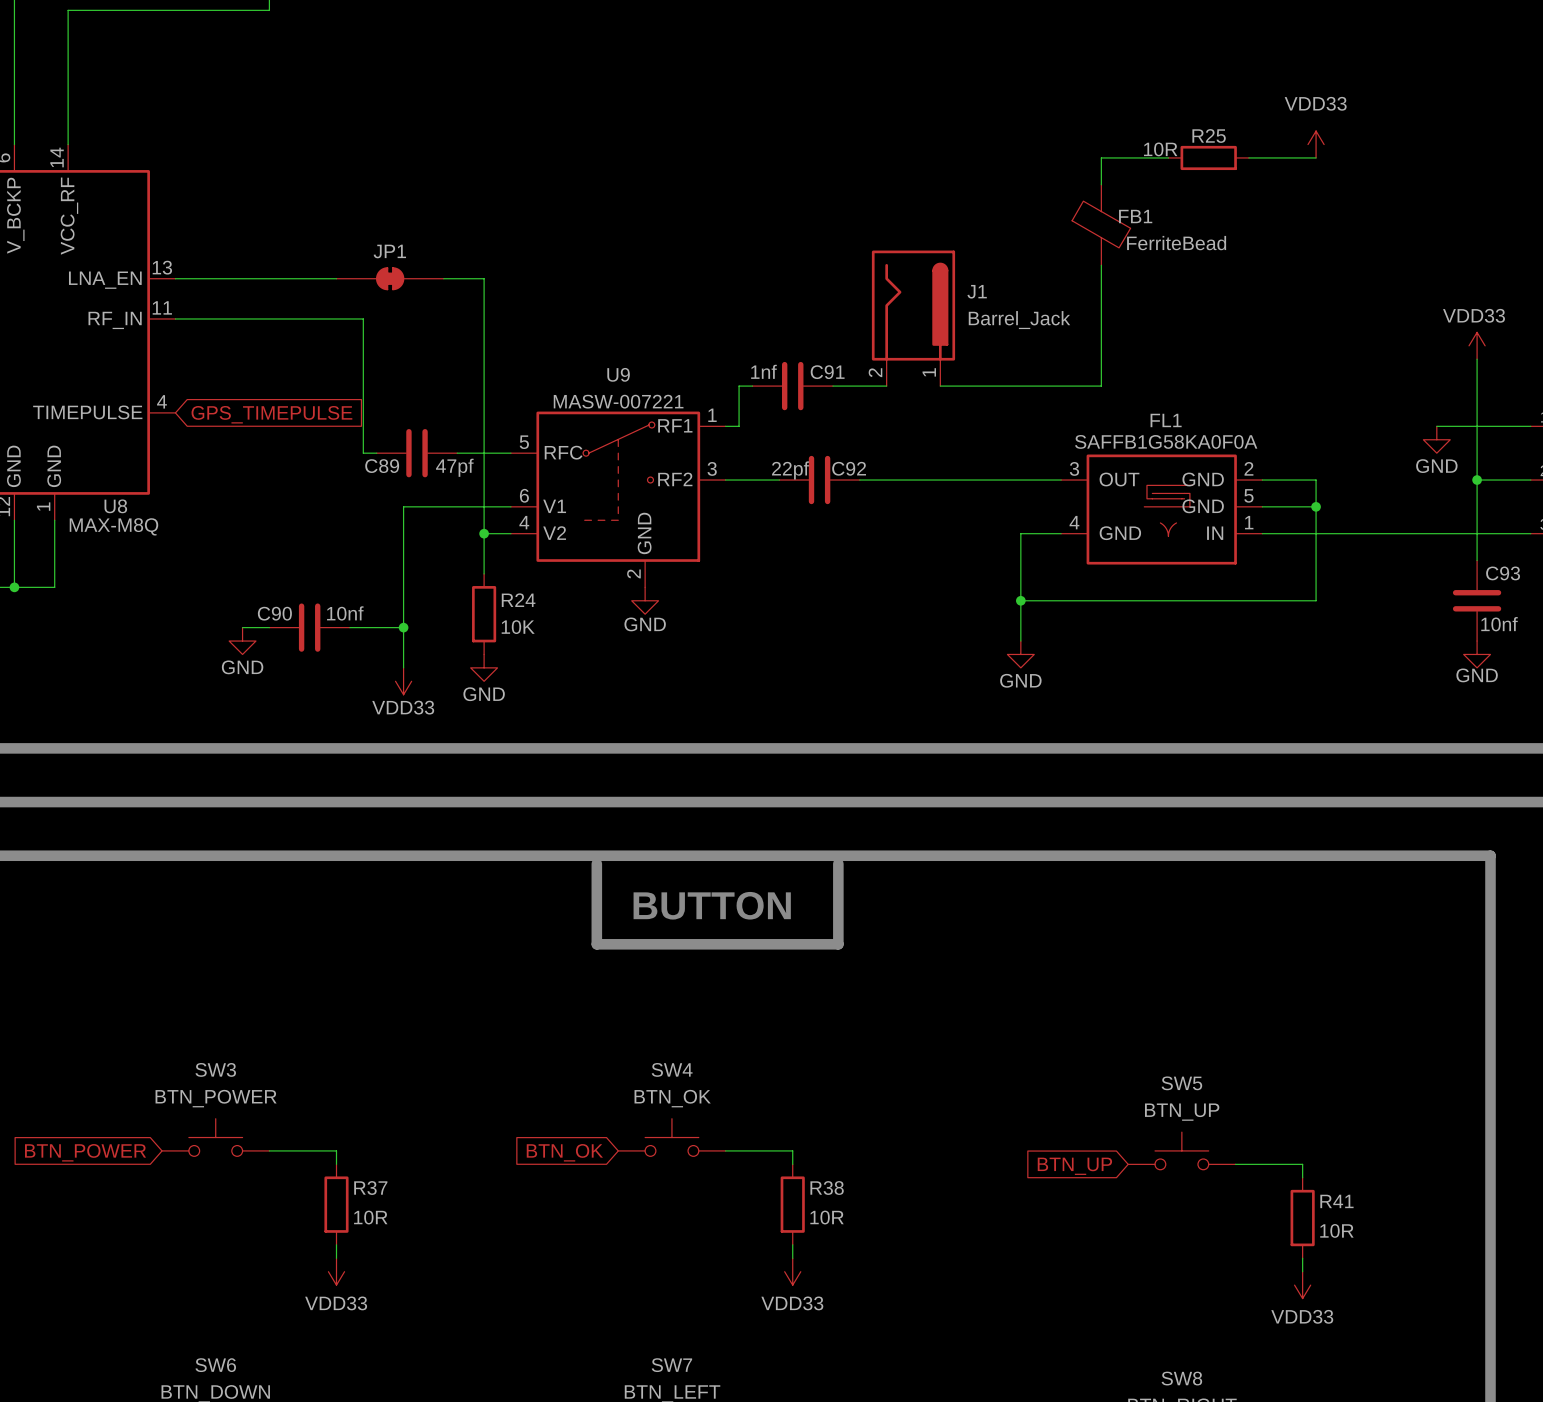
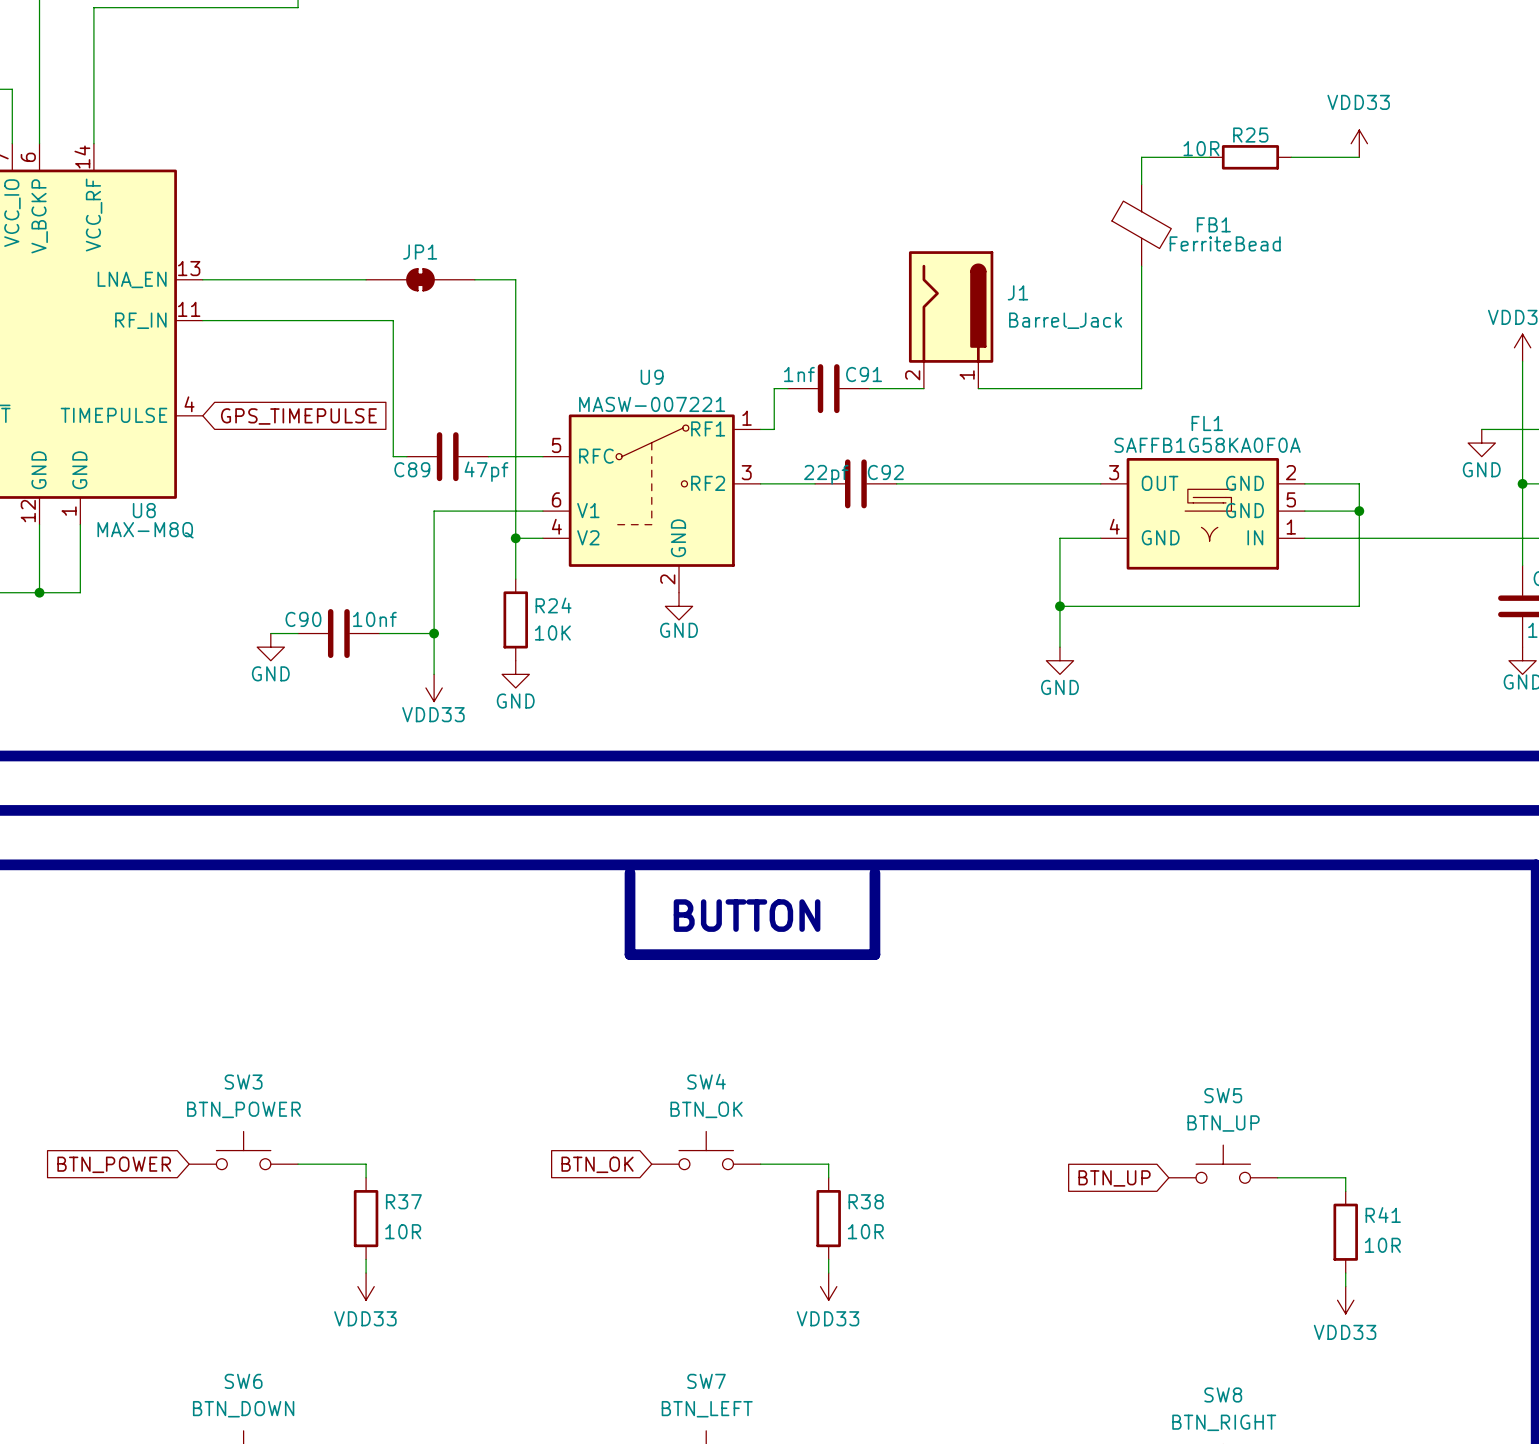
FB1 name position: FB1 (1135, 216) -> FB1 (1213, 224)

